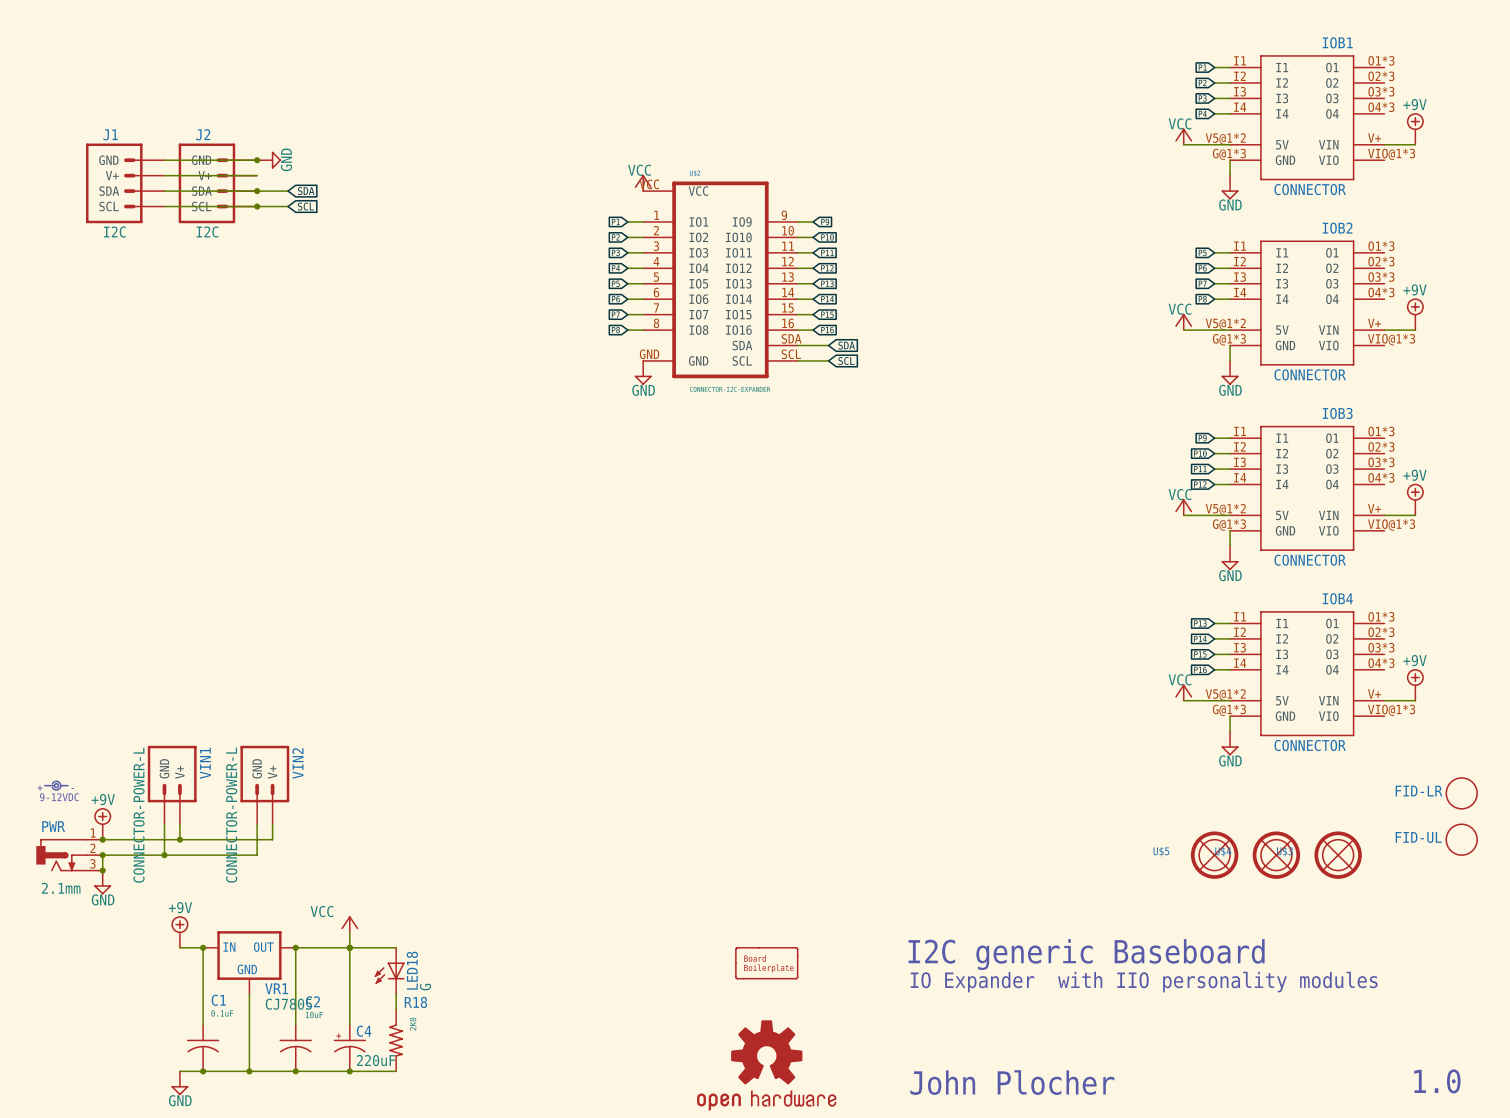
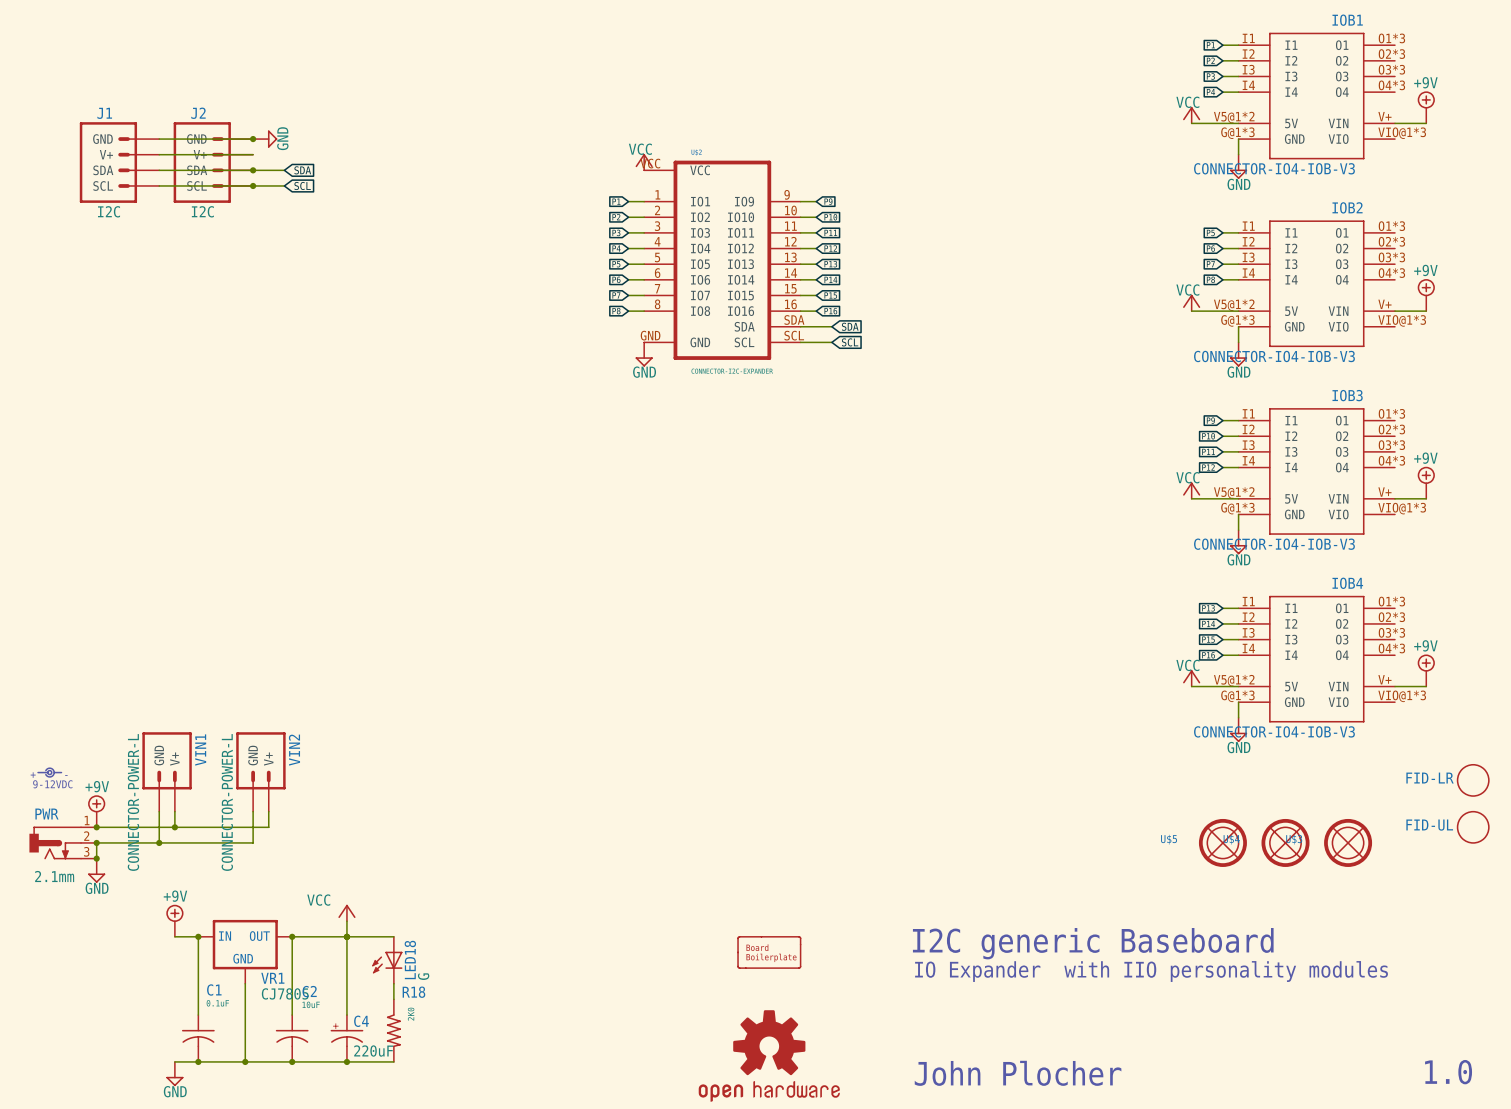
IOB1 value: CONNECTOR (1310, 189) -> CONNECTOR-IO4-IOB-V3 (1274, 168)
IOB2 value: CONNECTOR (1310, 374) -> CONNECTOR-IO4-IOB-V3 (1274, 356)
IOB3 value: CONNECTOR (1310, 560) -> CONNECTOR-IO4-IOB-V3 (1274, 544)
IOB4 value: CONNECTOR (1310, 745) -> CONNECTOR-IO4-IOB-V3 (1274, 731)

